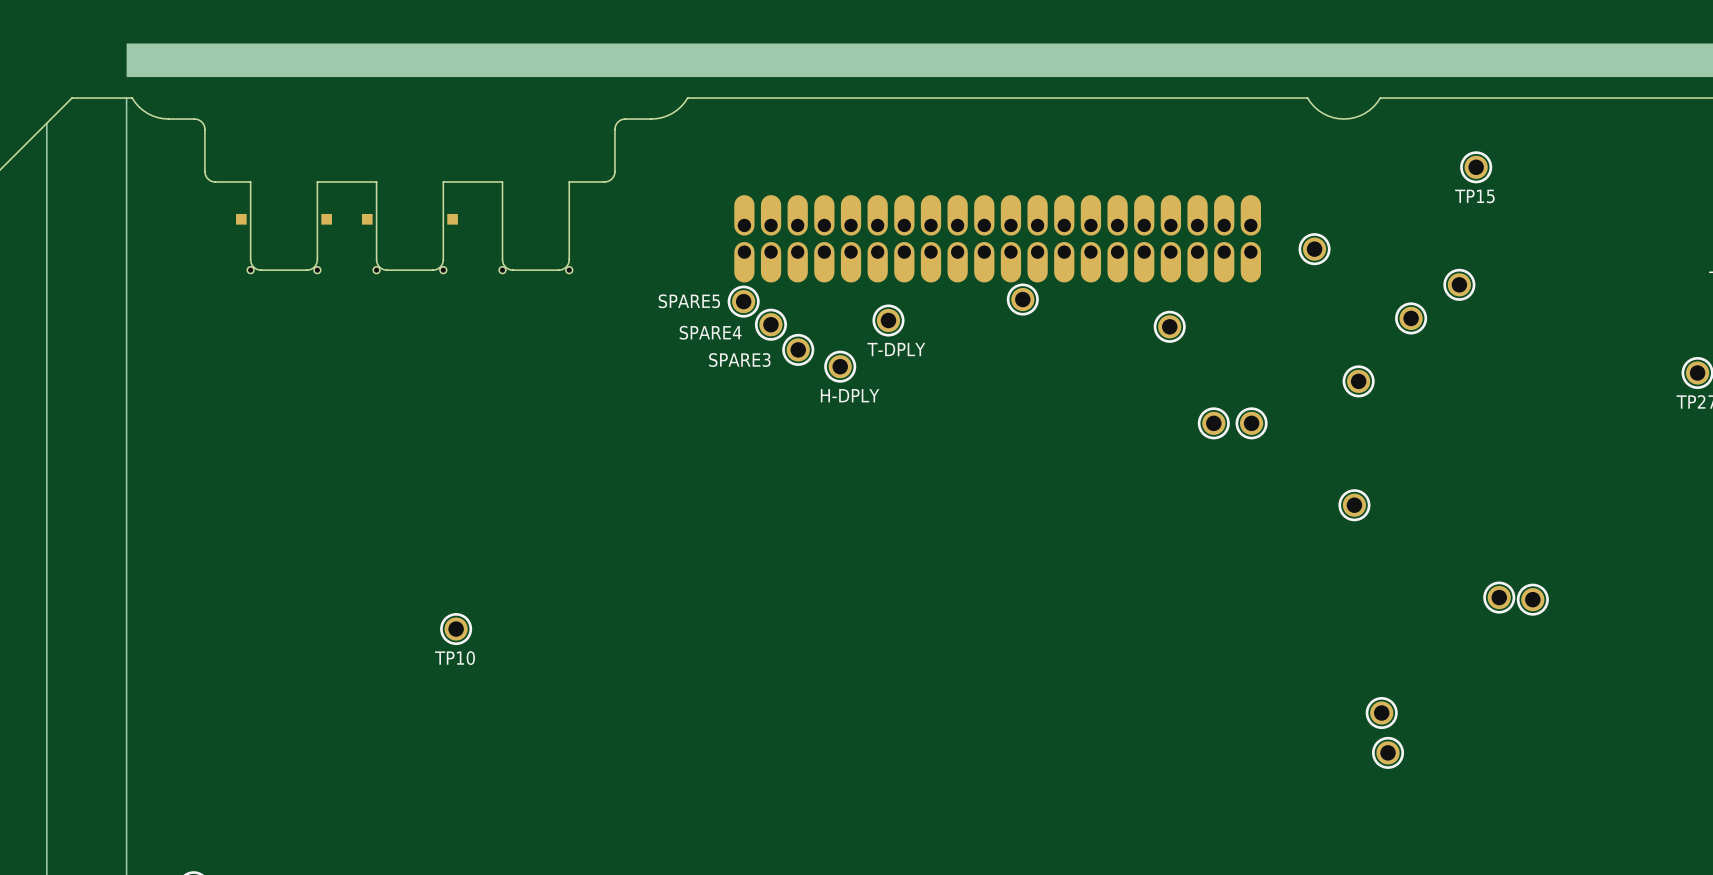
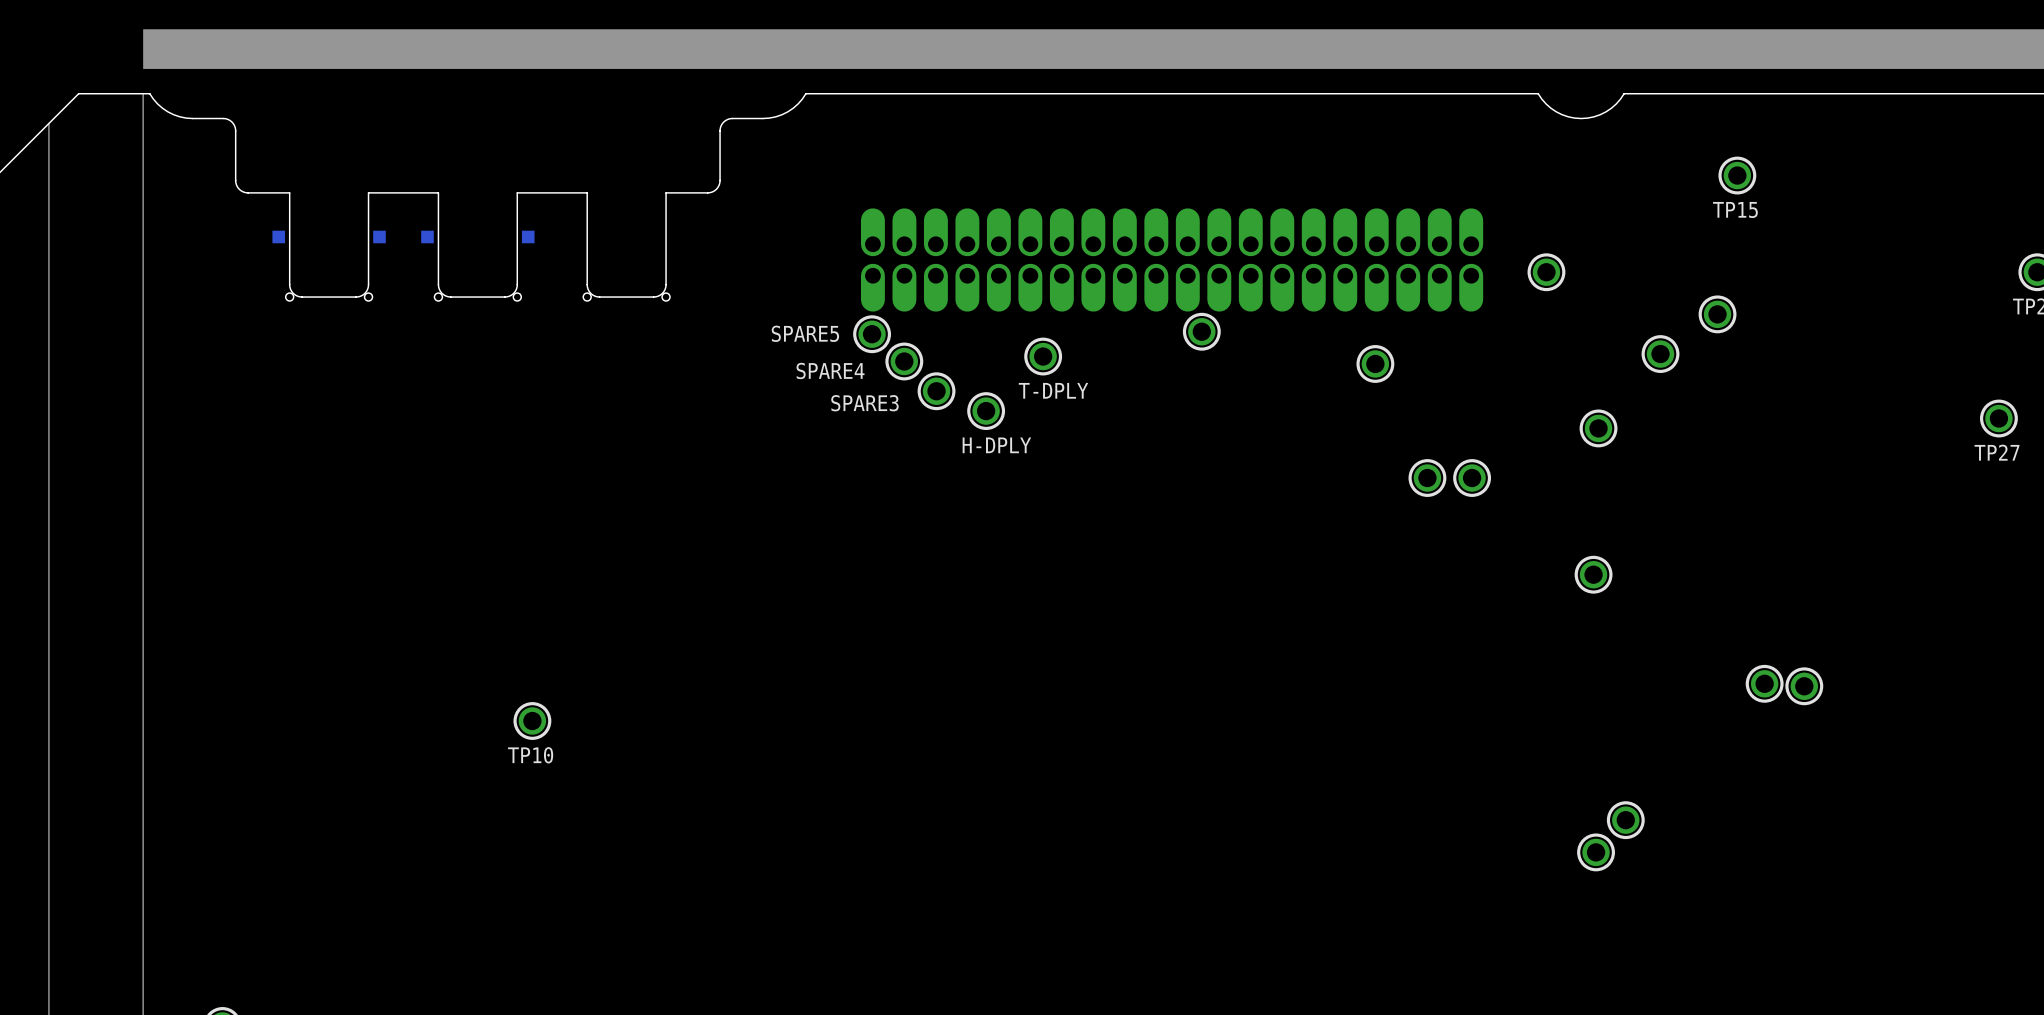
part position: (1388, 752) -> (1596, 852)

